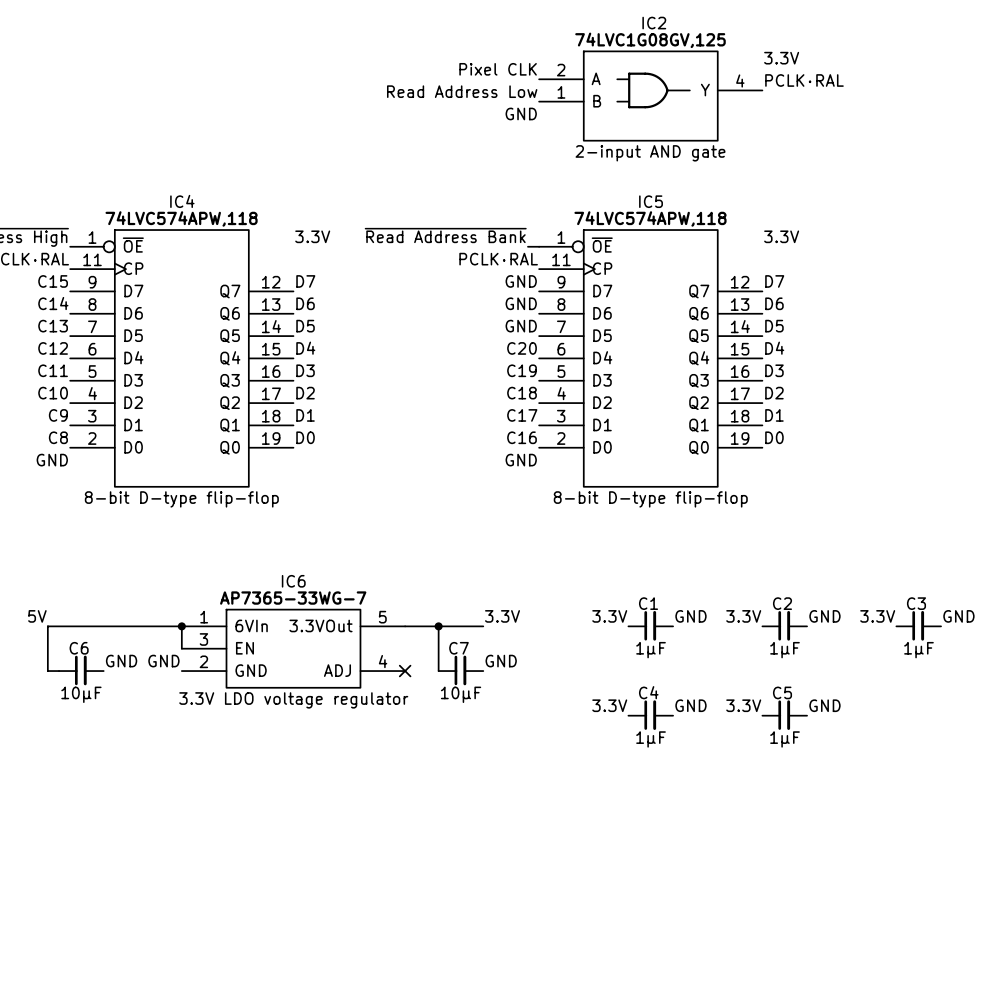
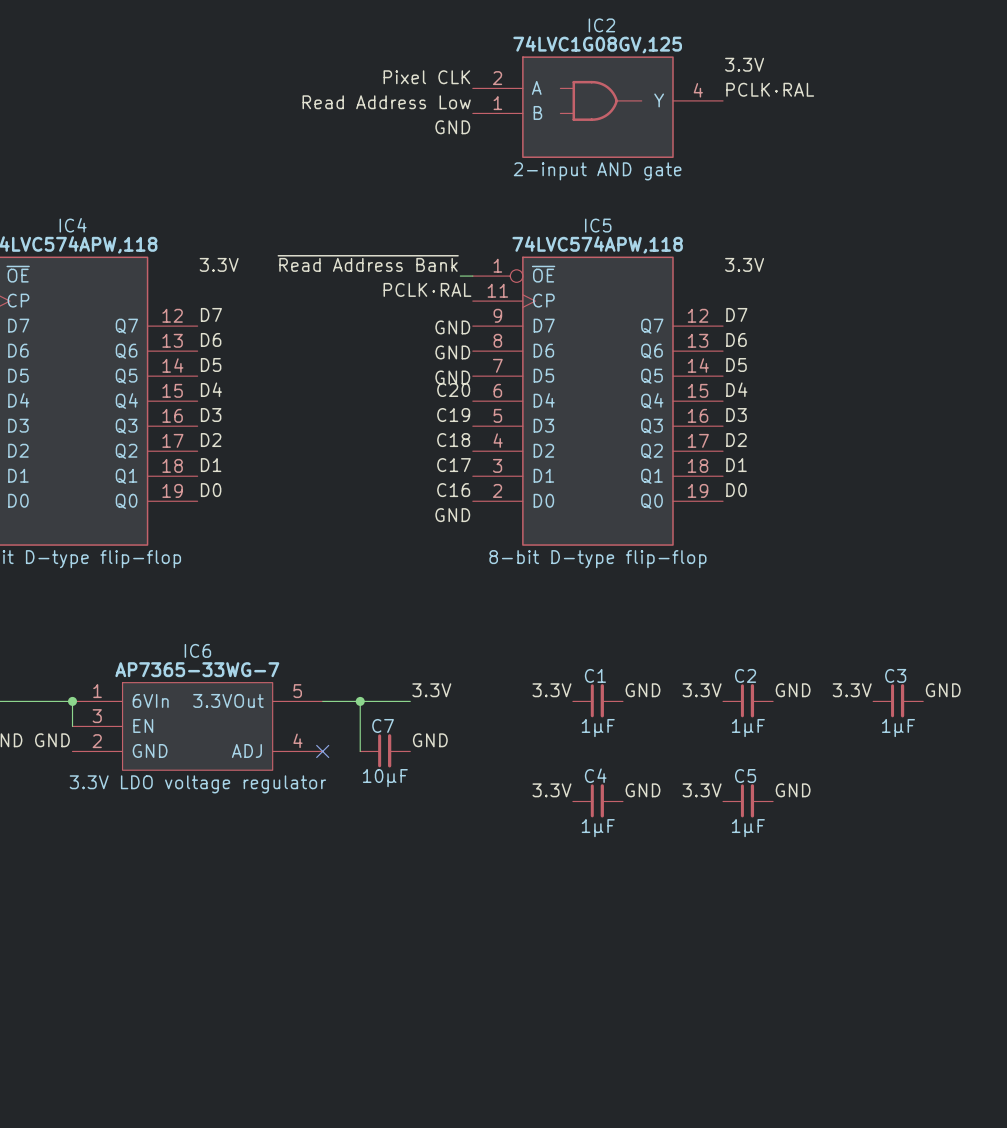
label: GND (521, 281) -> none
label: none -> GND (452, 327)
label: GND (521, 303) -> none
label: none -> GND (452, 352)
label: GND (521, 326) -> none
label: none -> GND (452, 377)

